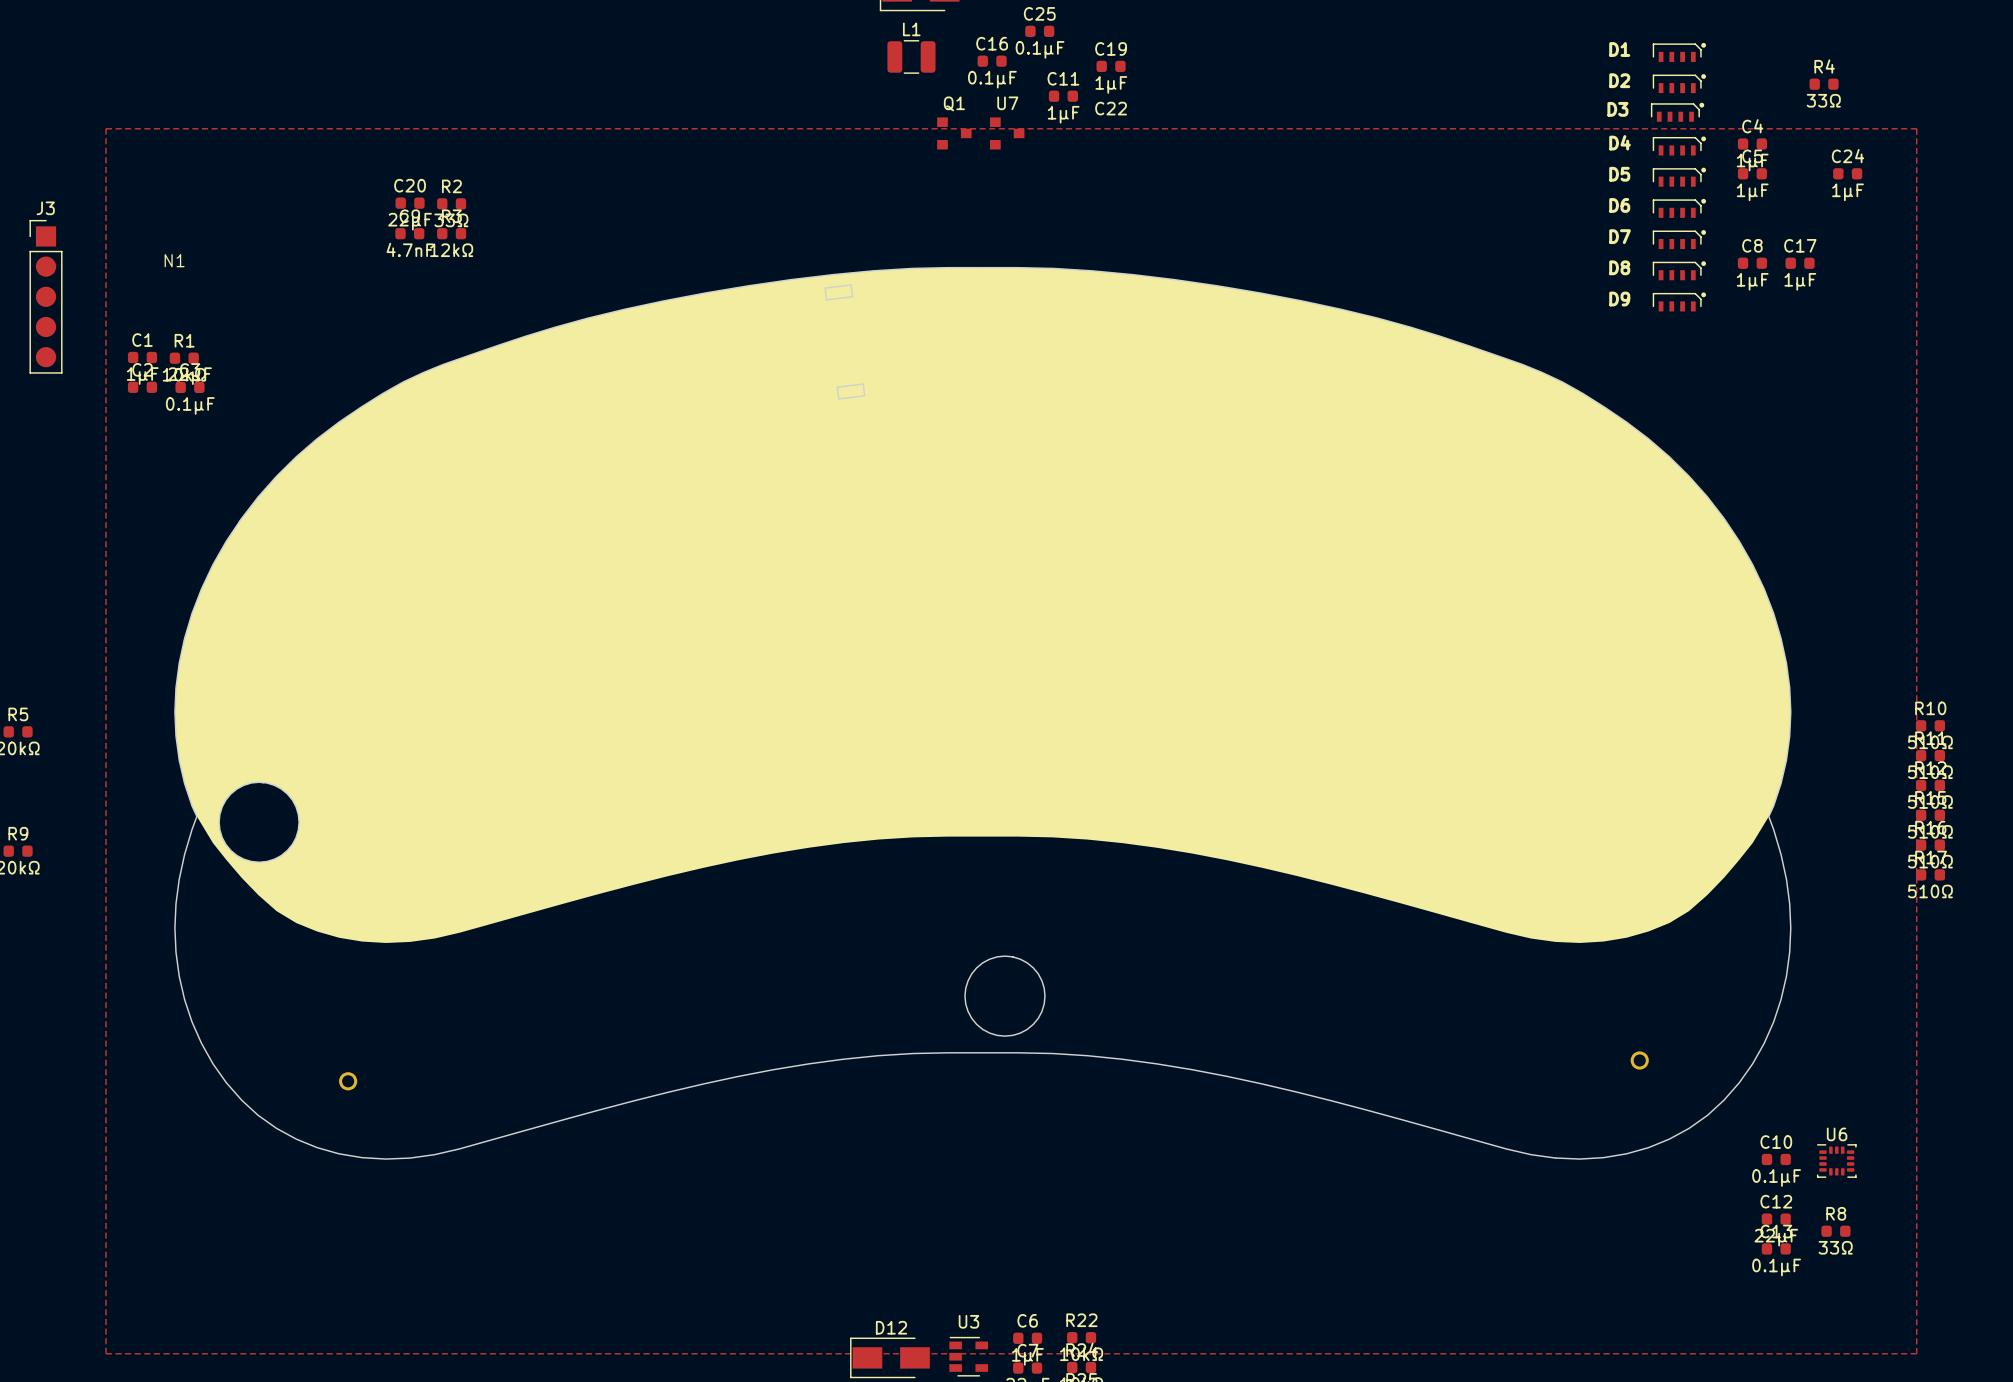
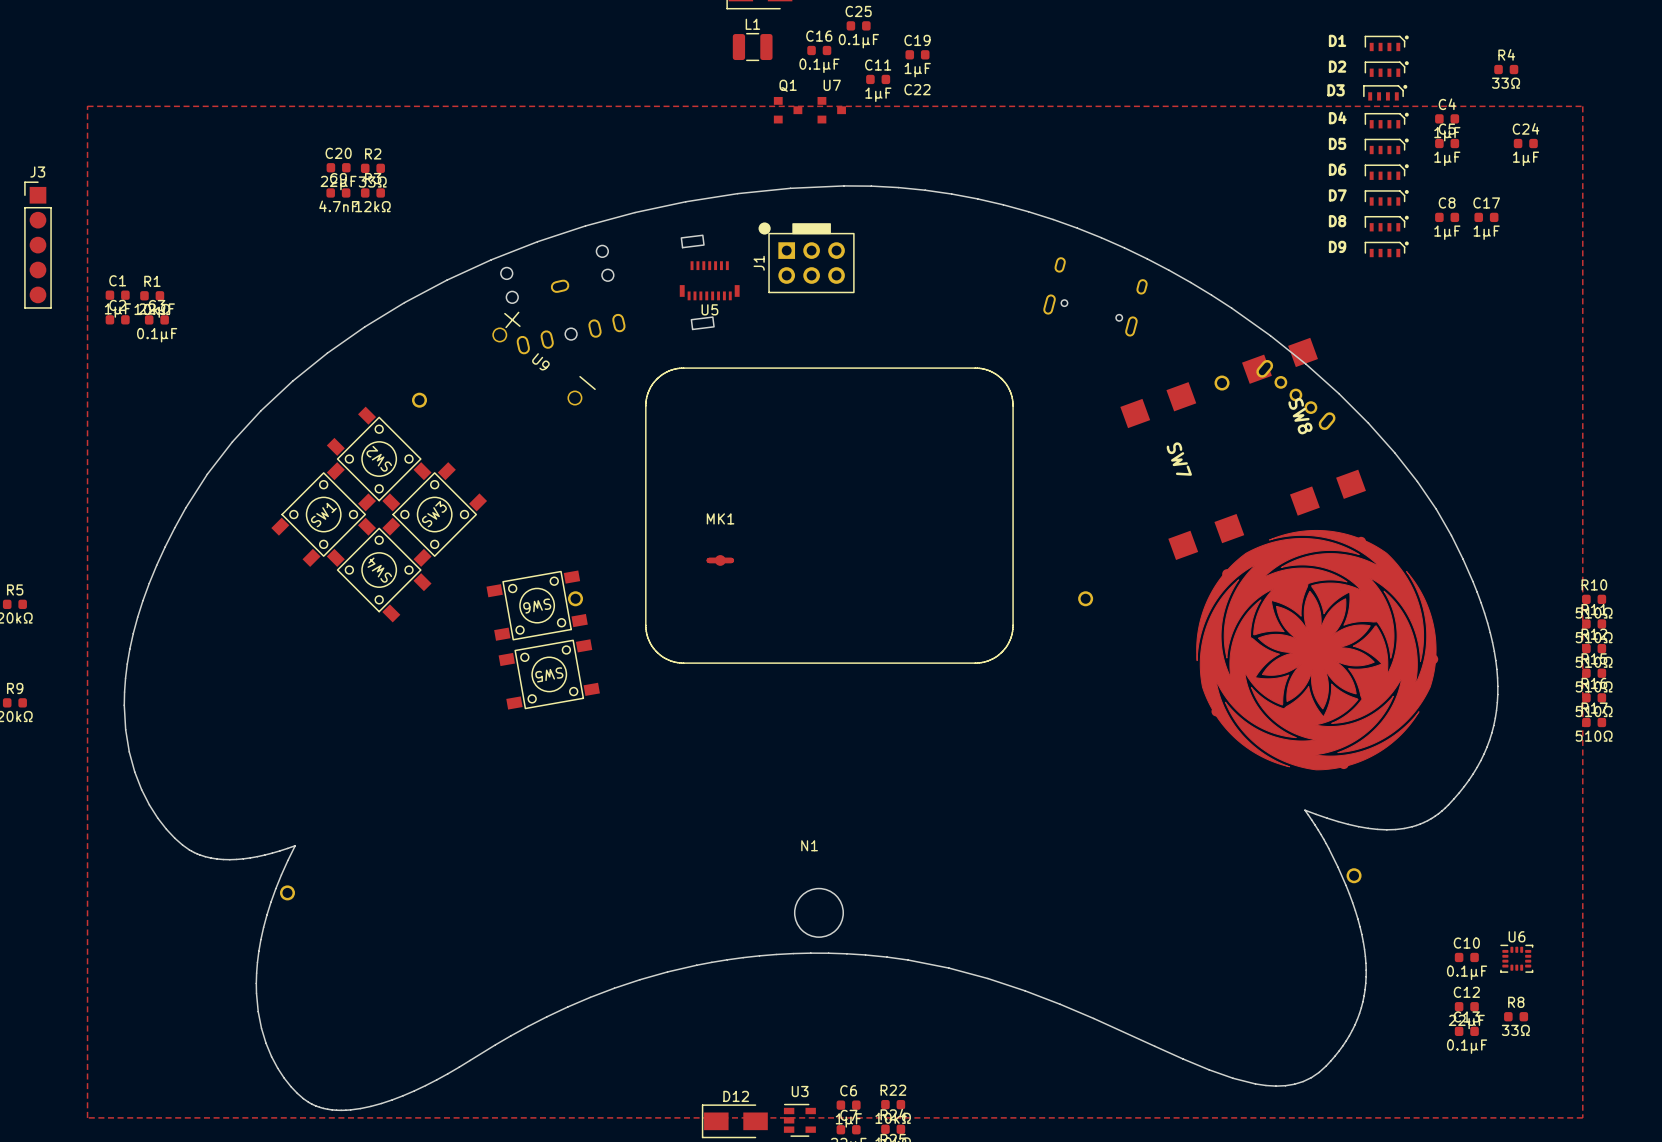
board edge: none -> (843, 185) (925, 190) (1003, 204) (1077, 228) (1124, 247) (1169, 270) (1231, 308) (1306, 364) (1368, 423) (1394, 452) (1436, 509) (1463, 559) (1487, 622) (1496, 669) (1497, 694) (1495, 718) (1487, 747) (1468, 780) (1445, 808) (1424, 822) (1404, 828) (1377, 829) (1348, 824) (1304, 810) (1323, 839) (1338, 867) (1352, 902) (1363, 941) (1365, 963) (1365, 989) (1359, 1013) (1349, 1035) (1330, 1061) (1311, 1077) (1294, 1084) (1265, 1085) (1233, 1078) (1208, 1069) (1093, 1018) (1025, 990) (948, 968) (908, 960) (865, 954) (828, 953) (776, 954) (696, 965) (614, 988) (547, 1016) (436, 1079) (381, 1103) (341, 1110) (323, 1108) (308, 1102) (290, 1086) (271, 1056) (261, 1028) (256, 993) (257, 962) (263, 927) (275, 888) (295, 845) (264, 855) (236, 859) (211, 858) (191, 851) (166, 829) (149, 805) (134, 771) (129, 751) (125, 729) (124, 692) (133, 633) (142, 600) (156, 565) (185, 507) (207, 474) (232, 441) (260, 410) (292, 381) (327, 353) (364, 327) (446, 280) (537, 241) (635, 212) (737, 193) (843, 185)
N1 name position: N1 (174, 260) -> N1 (809, 845)
N1 footprint: [174, 267, 1792, 1160] -> [801, 840, 818, 852]
part: none -> (1295, 394)
round board edge: none -> [793, 887, 844, 938]

